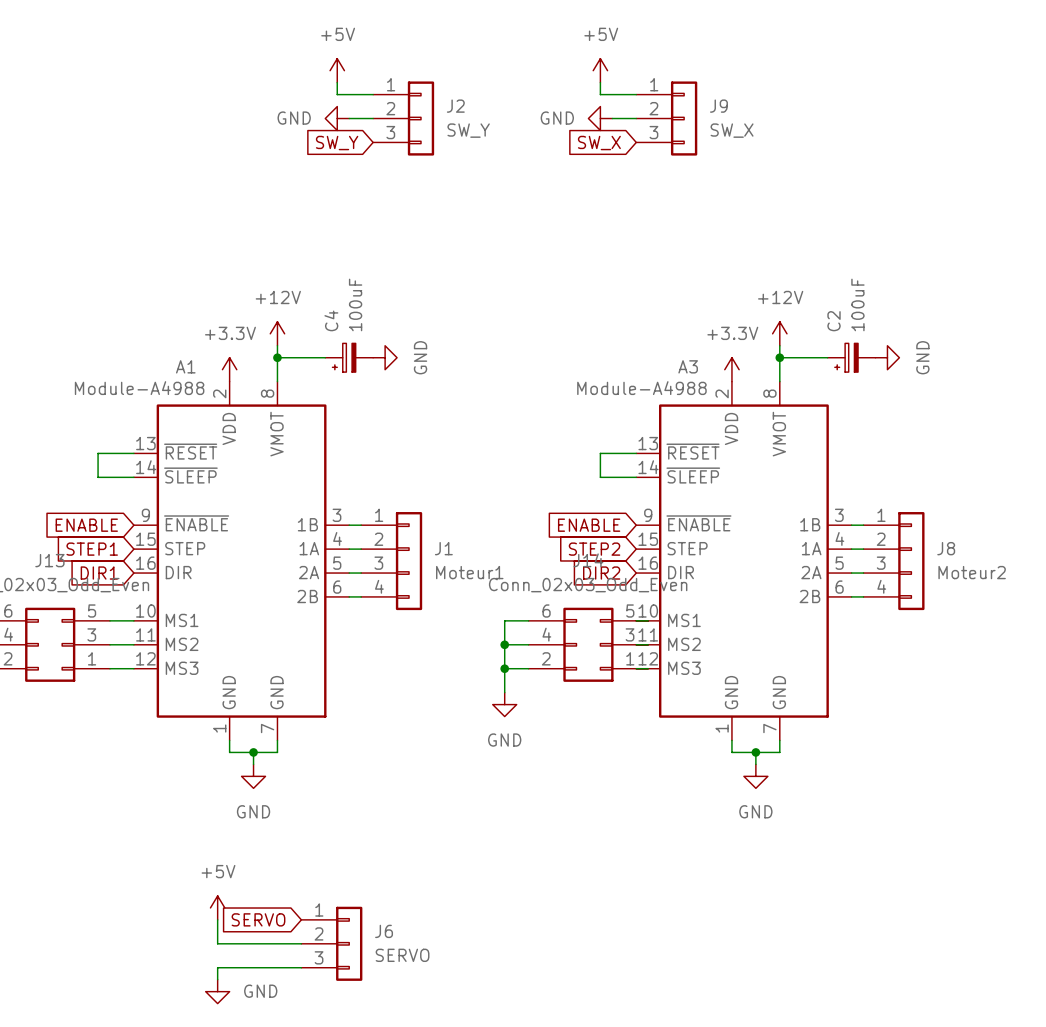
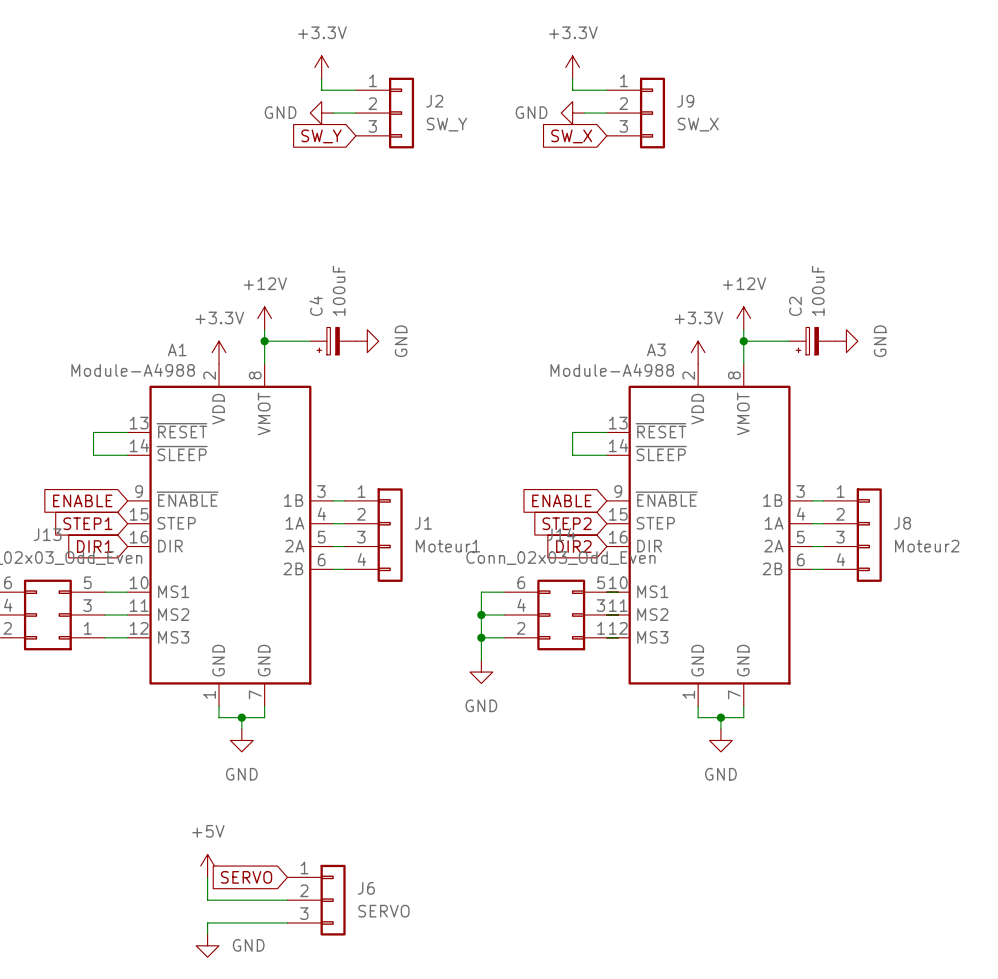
power symbol: +5V (337, 70) -> +3.3V (321, 67)
power symbol: +5V (600, 70) -> +3.3V (572, 67)

